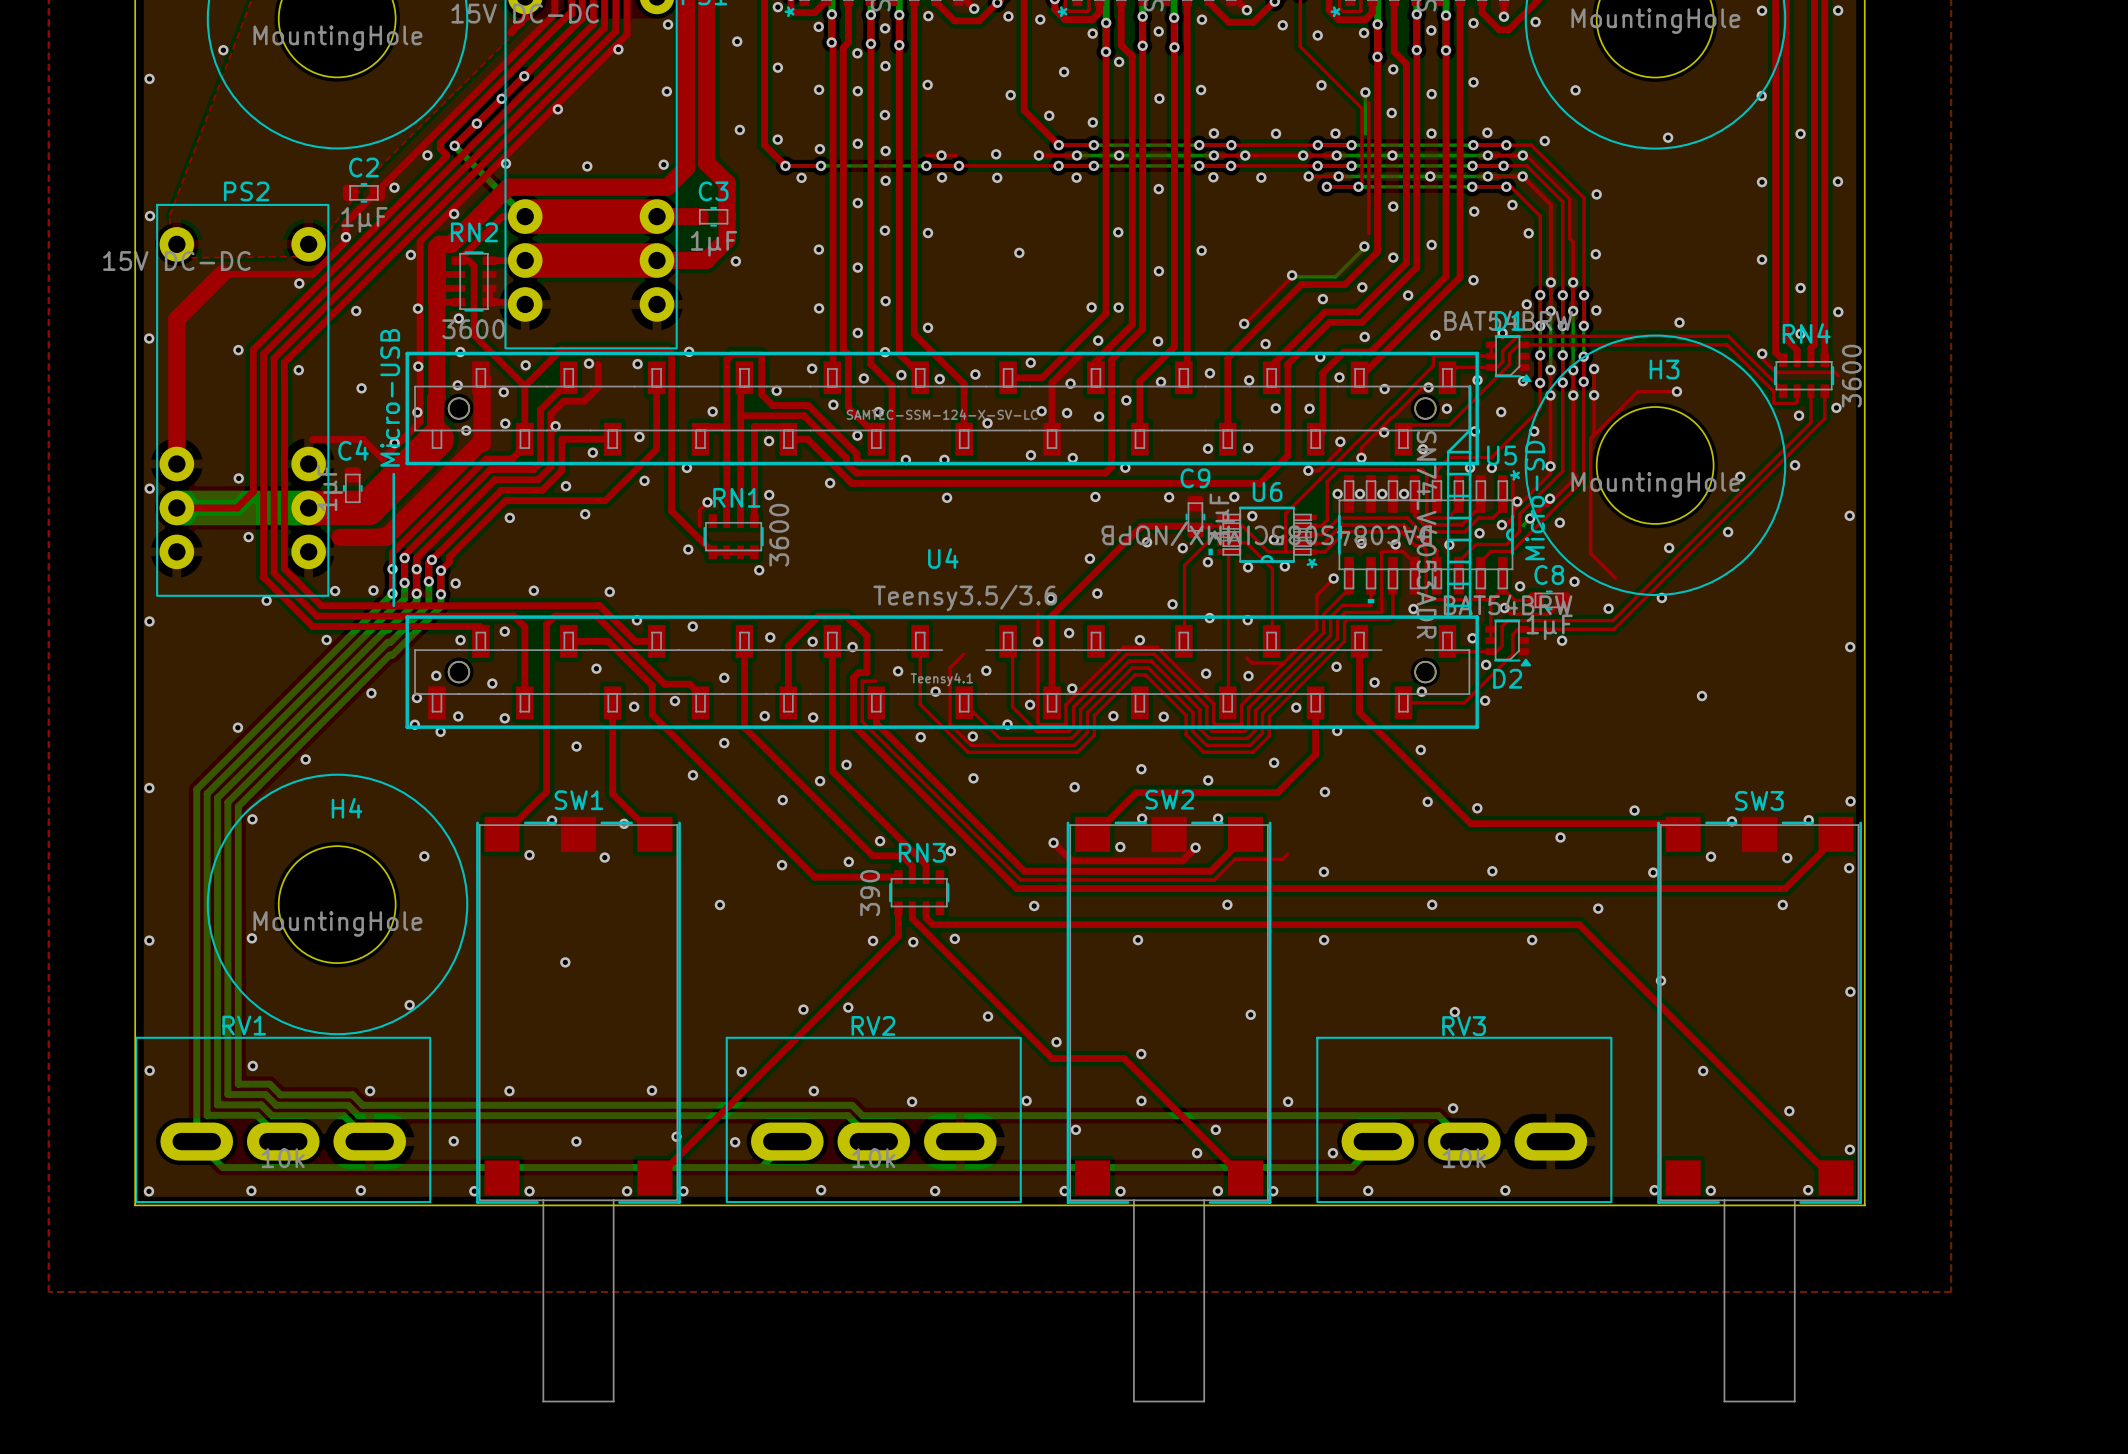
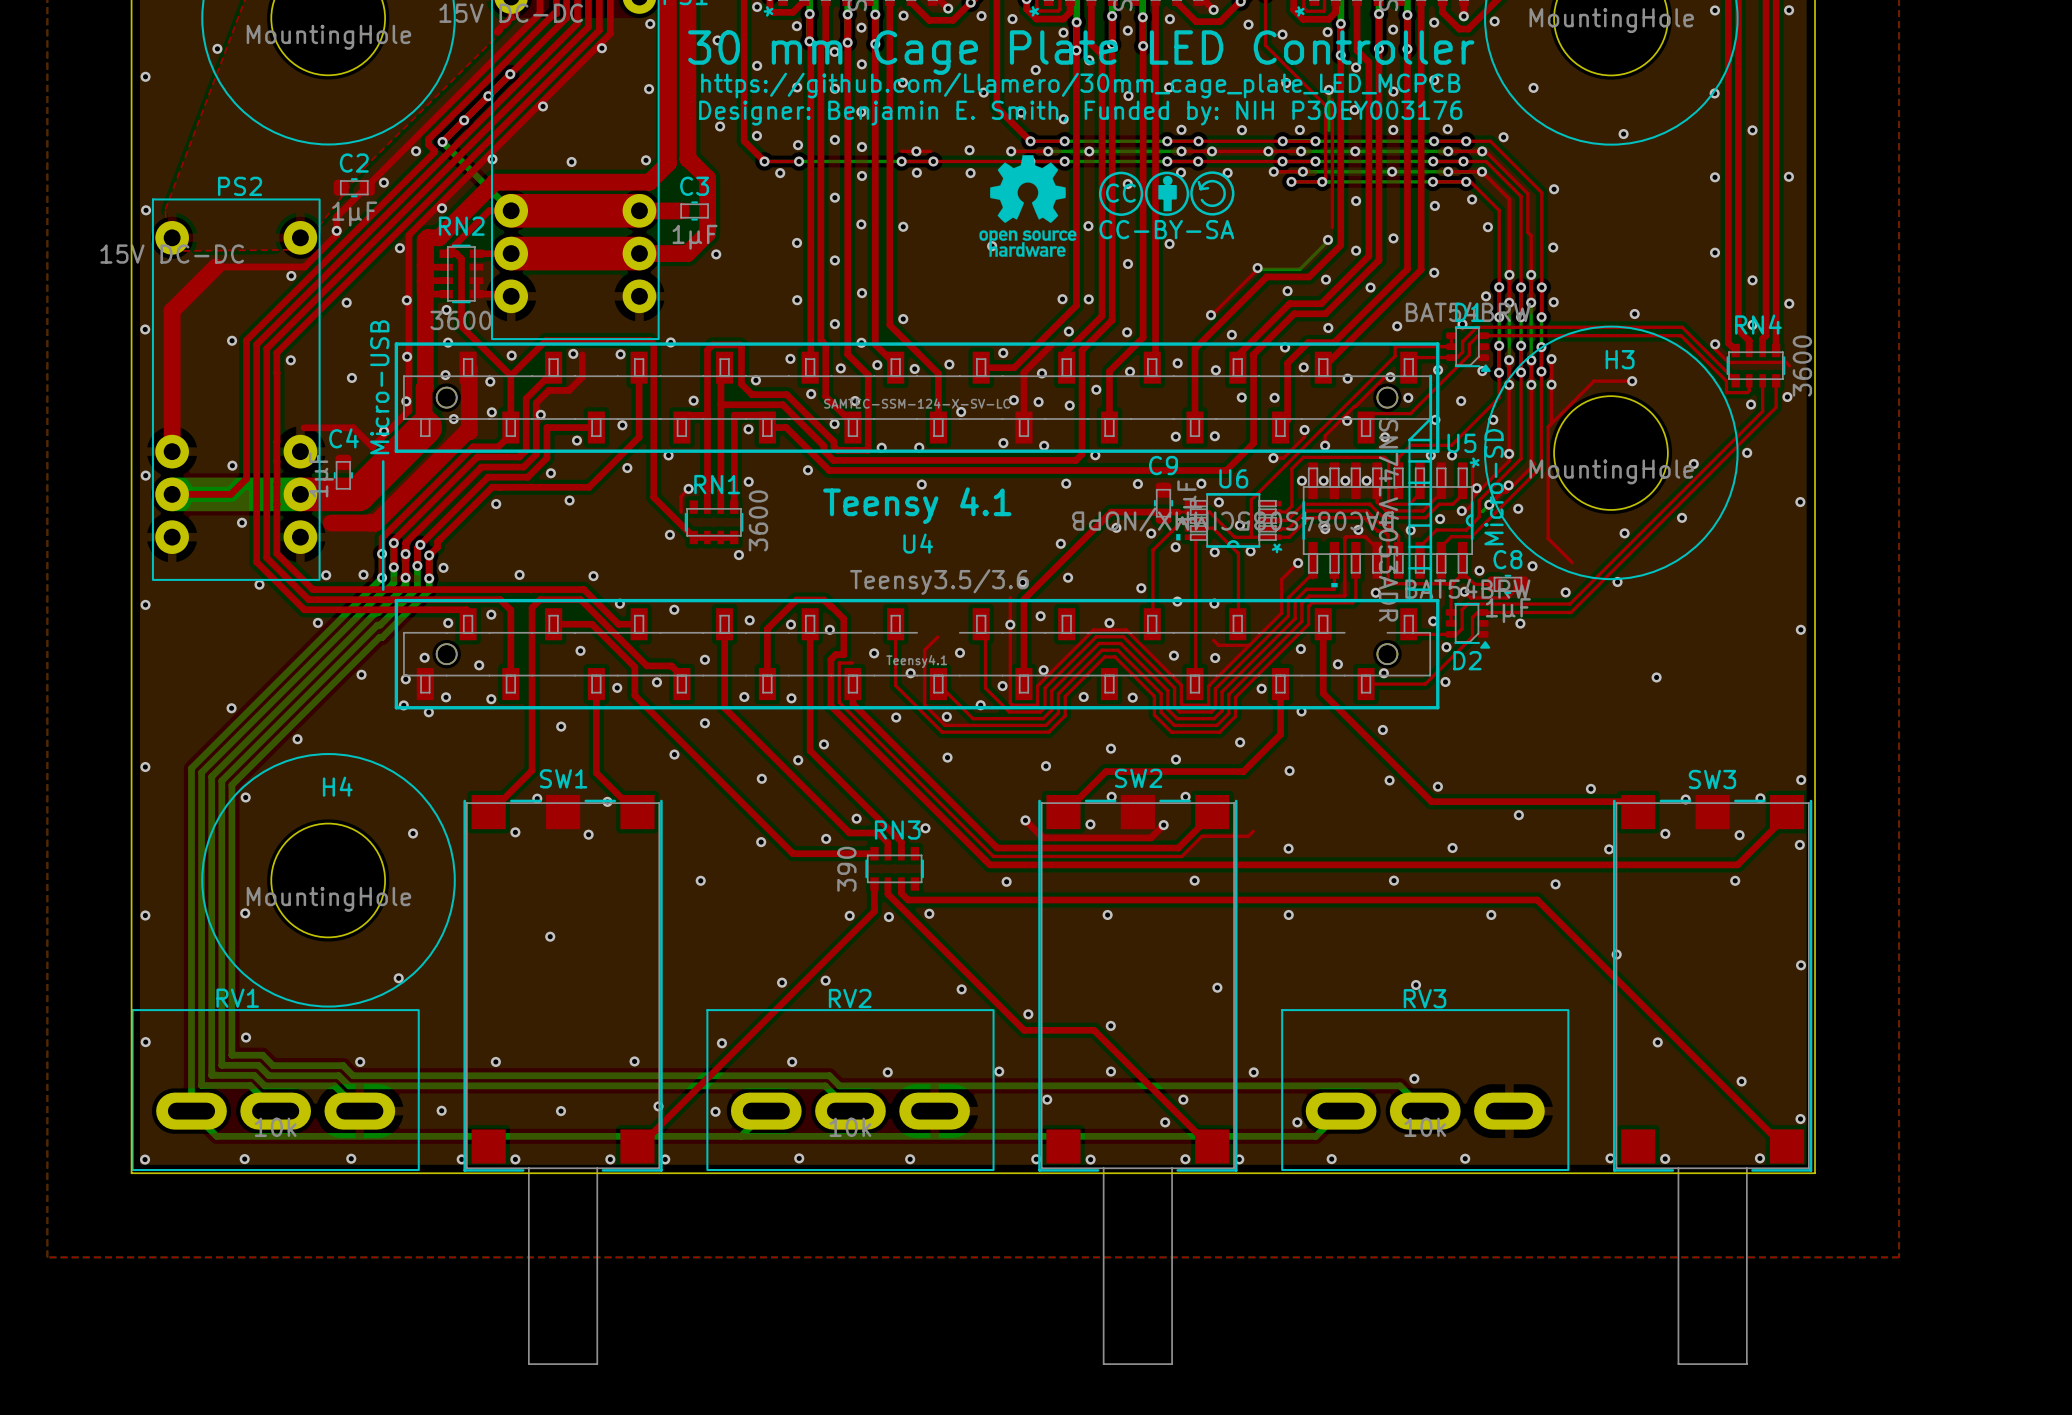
text: none -> 30 mm Cage Plate LED Controller (1081, 52)
text: none -> https://github.com/Llamero/30mm_cage_plate_LED_MCPCB (1080, 85)
text: none -> Designer: Benjamin E. Smith, Funded by: NIH P30EY003176 (1080, 113)
drawing: none -> [979, 155, 1235, 257]
text: none -> Teensy 4.1 (917, 505)

